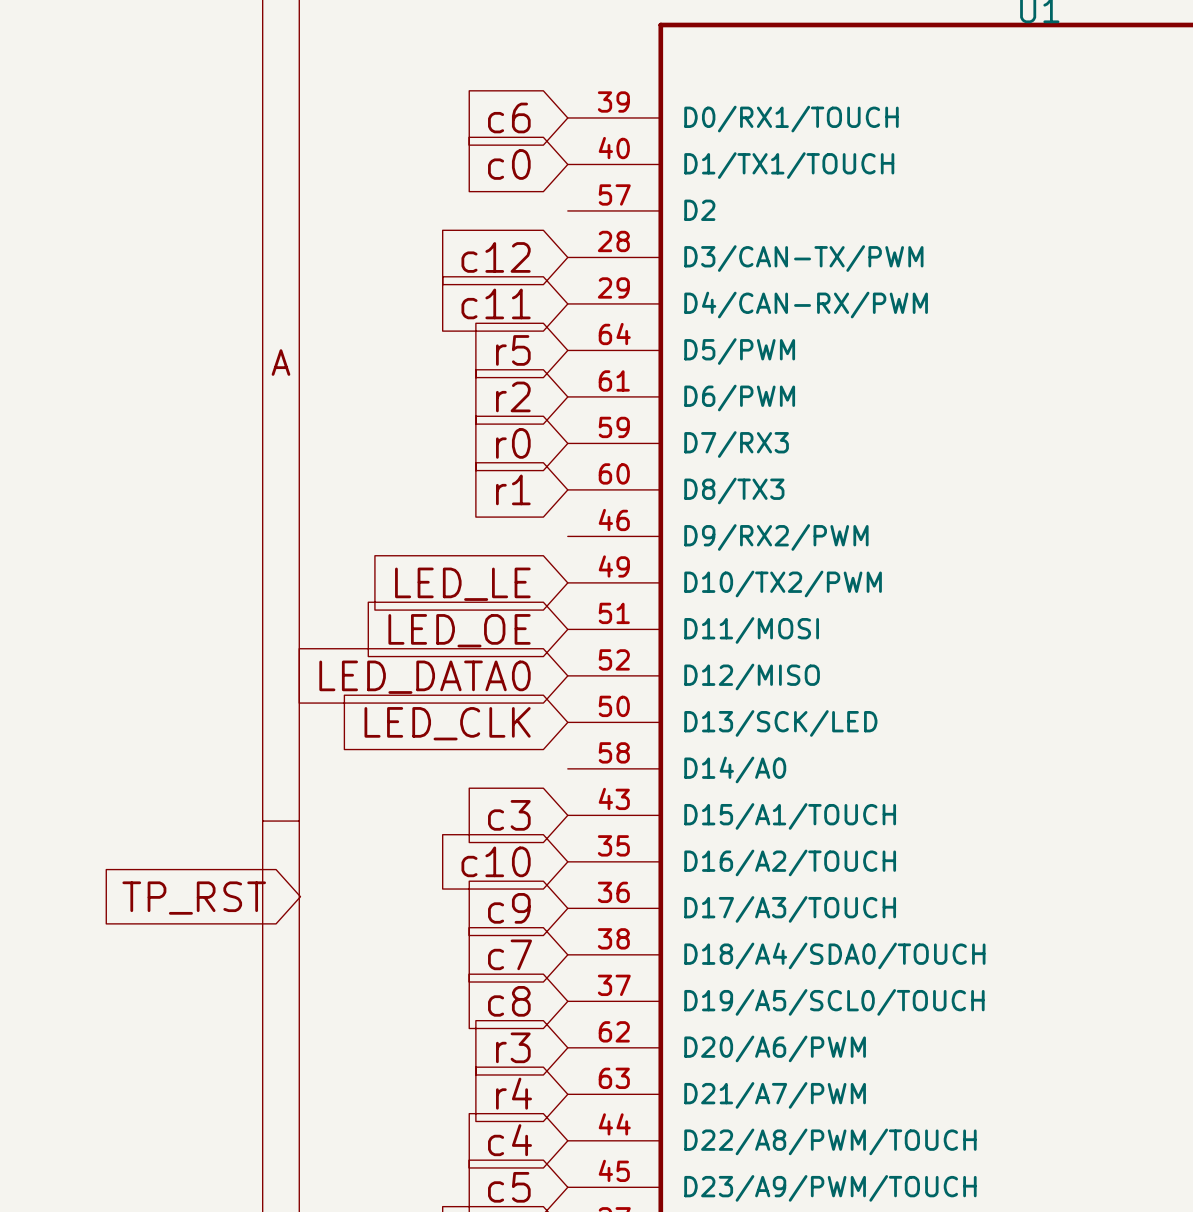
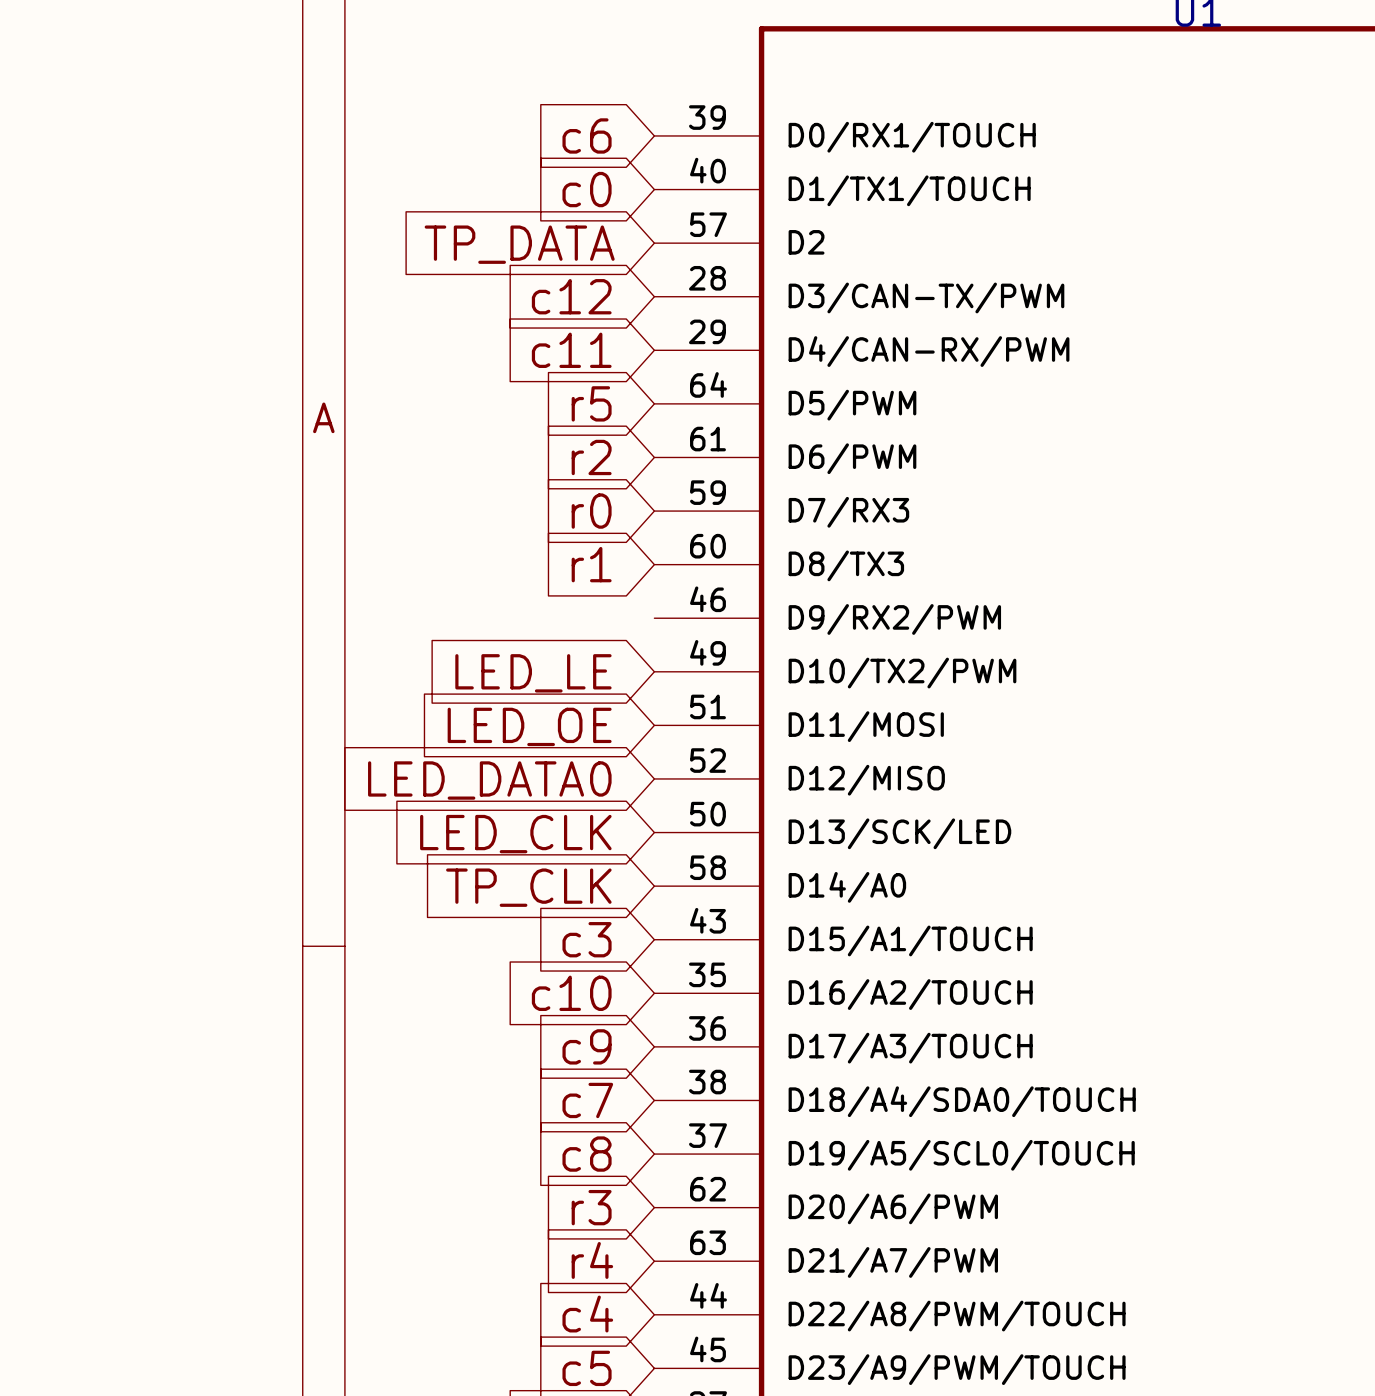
global label: none -> TP_DATA (519, 244)
global label: none -> TP_CLK (528, 887)
global label: TP_RST (194, 898) -> none

